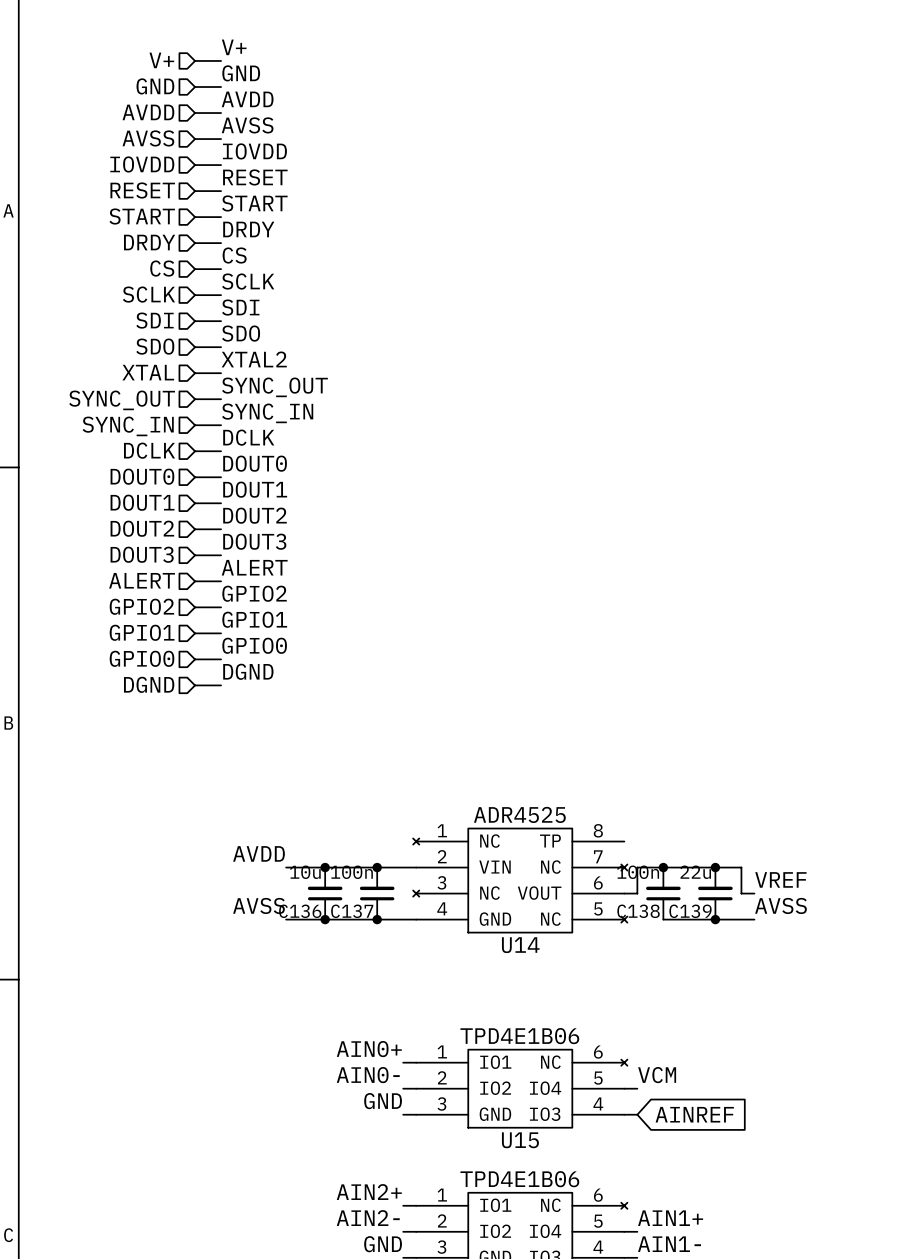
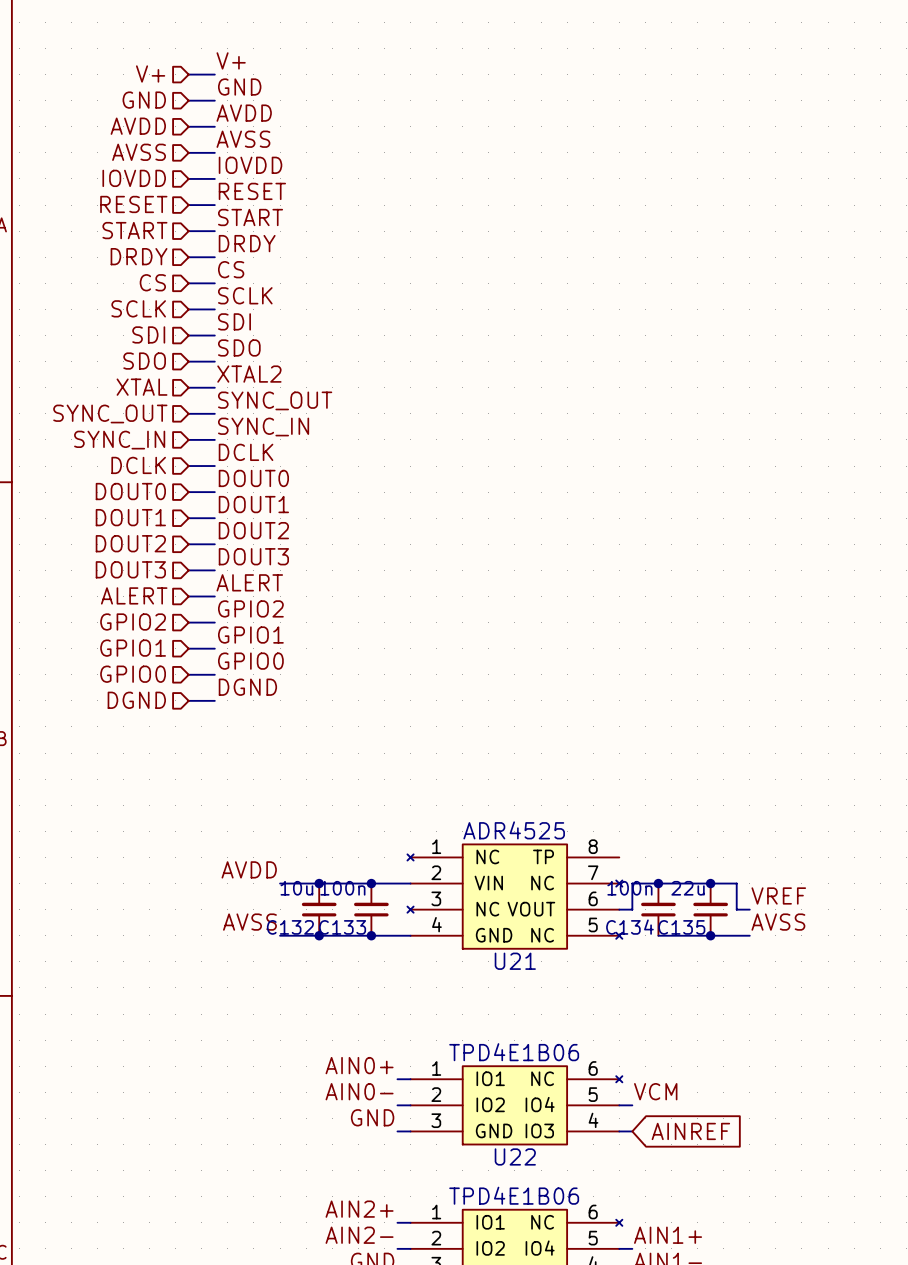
C136 name: C136 (300, 911) -> C132 (290, 927)
C137 name: C137 (352, 911) -> C133 (342, 927)
C138 name: C138 (638, 911) -> C134 (629, 927)
C139 name: C139 (690, 911) -> C135 (681, 927)
U14 name: U14 (520, 945) -> U21 (515, 961)
U15 name: U15 (520, 1140) -> U22 (515, 1156)

